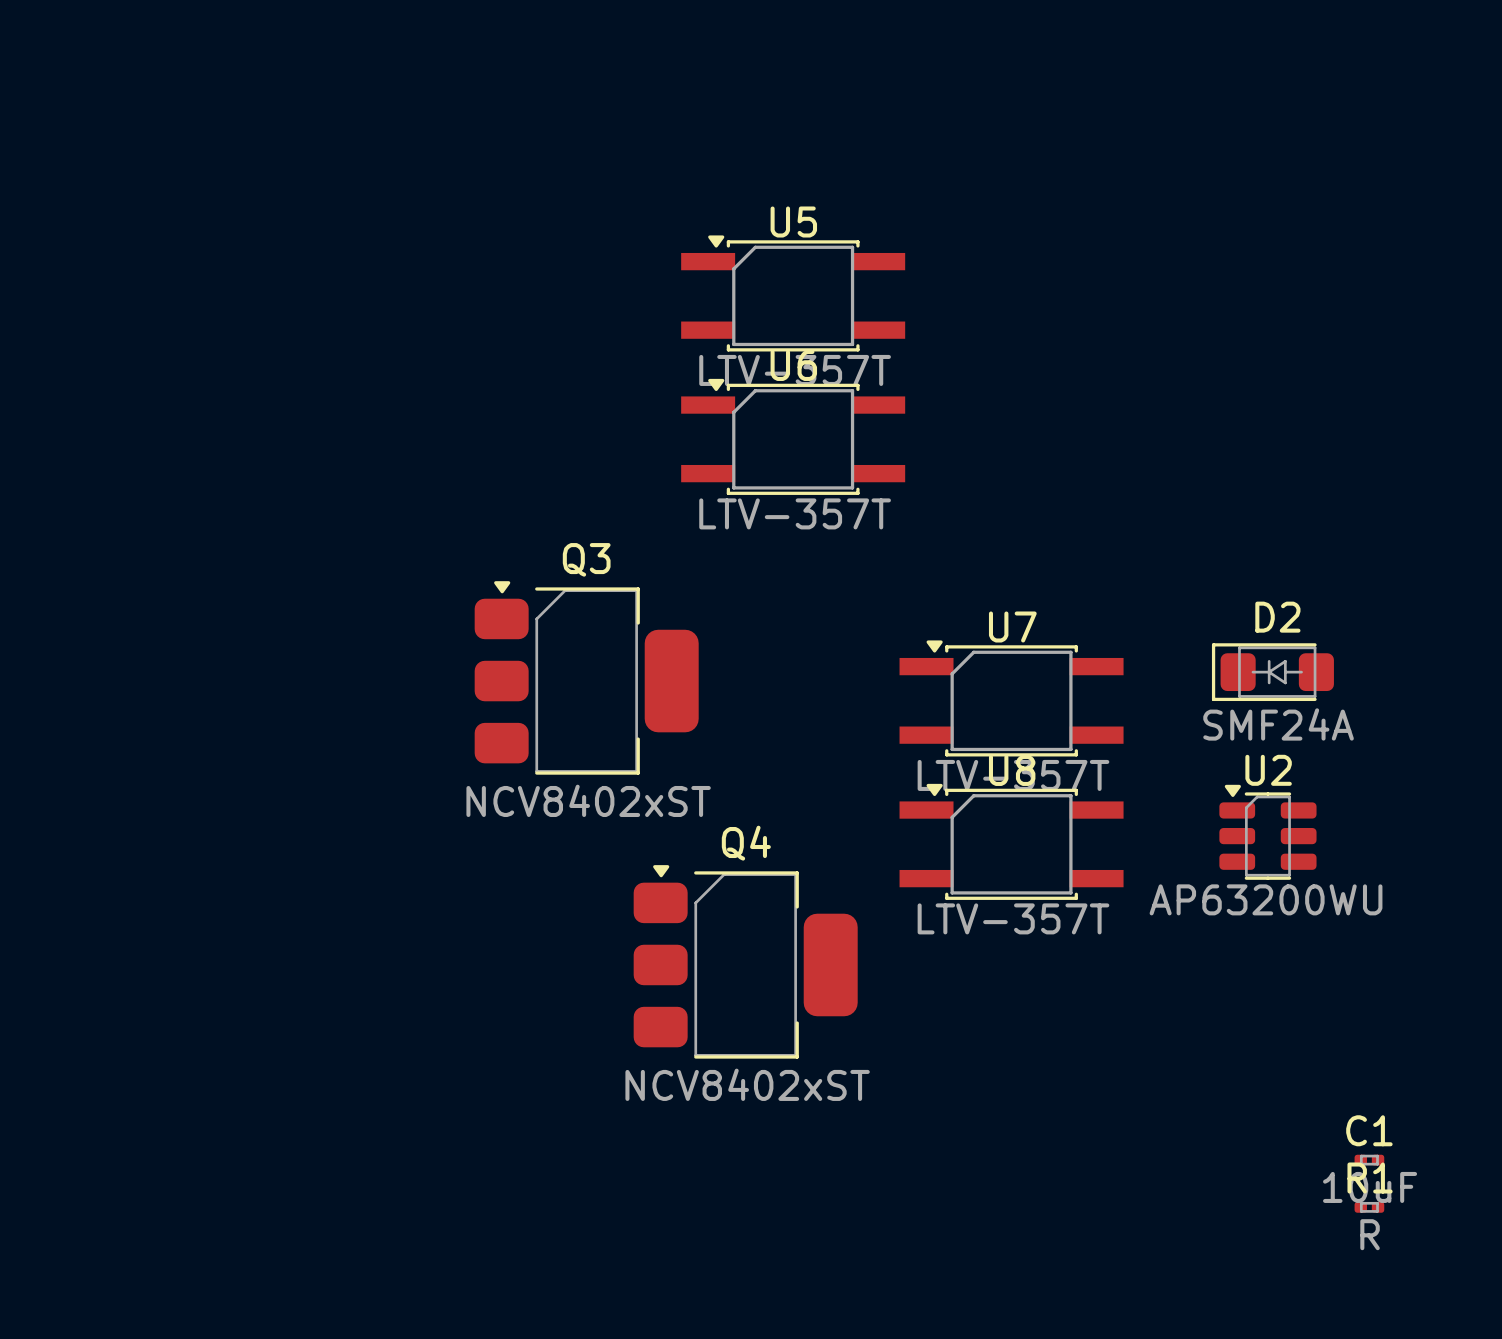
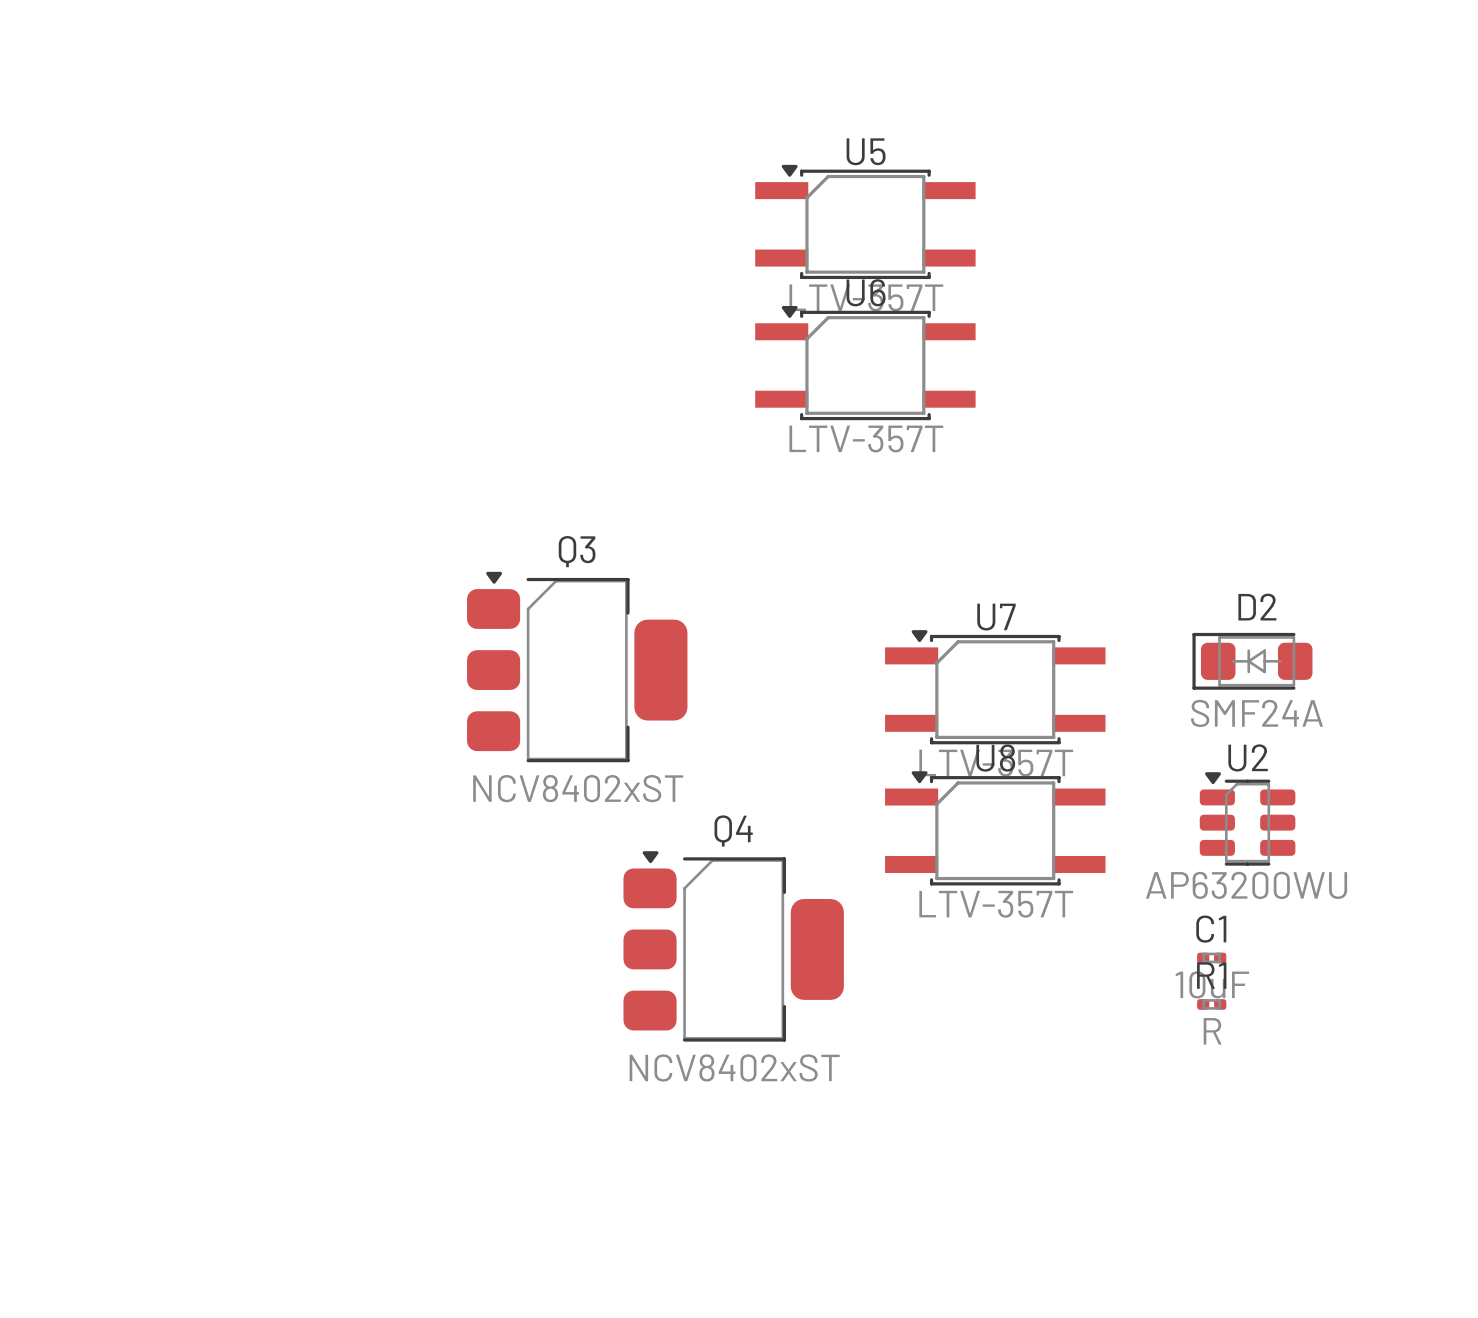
U5 position: (793, 293) -> (865, 221)
U6 position: (793, 436) -> (865, 363)
C1 position: (1369, 1160) -> (1211, 957)
R1 position: (1369, 1207) -> (1211, 1004)

